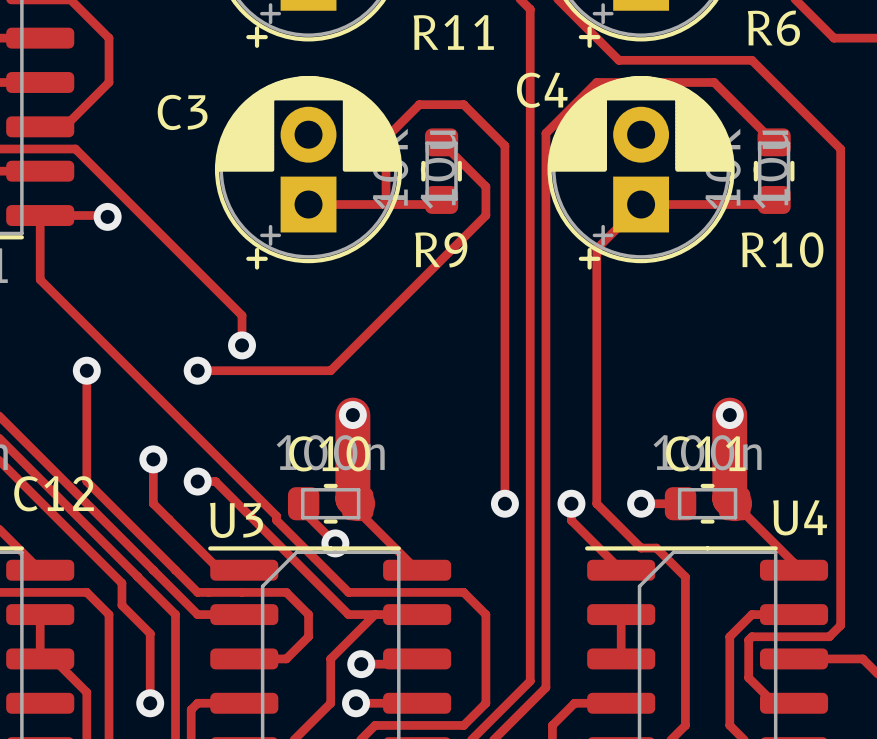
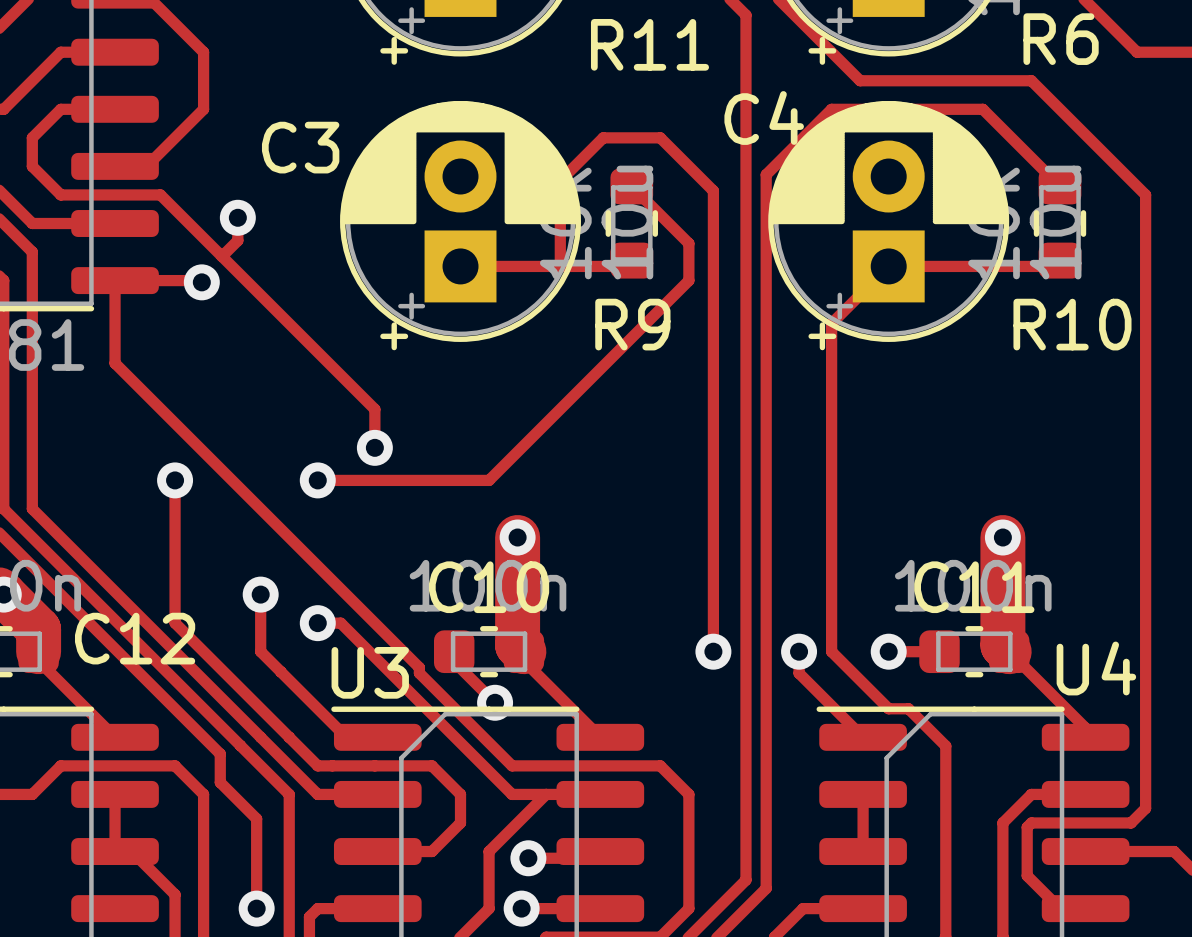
track: none -> (237, 217) (237, 240) (222, 256)
via: none -> (237, 217)

